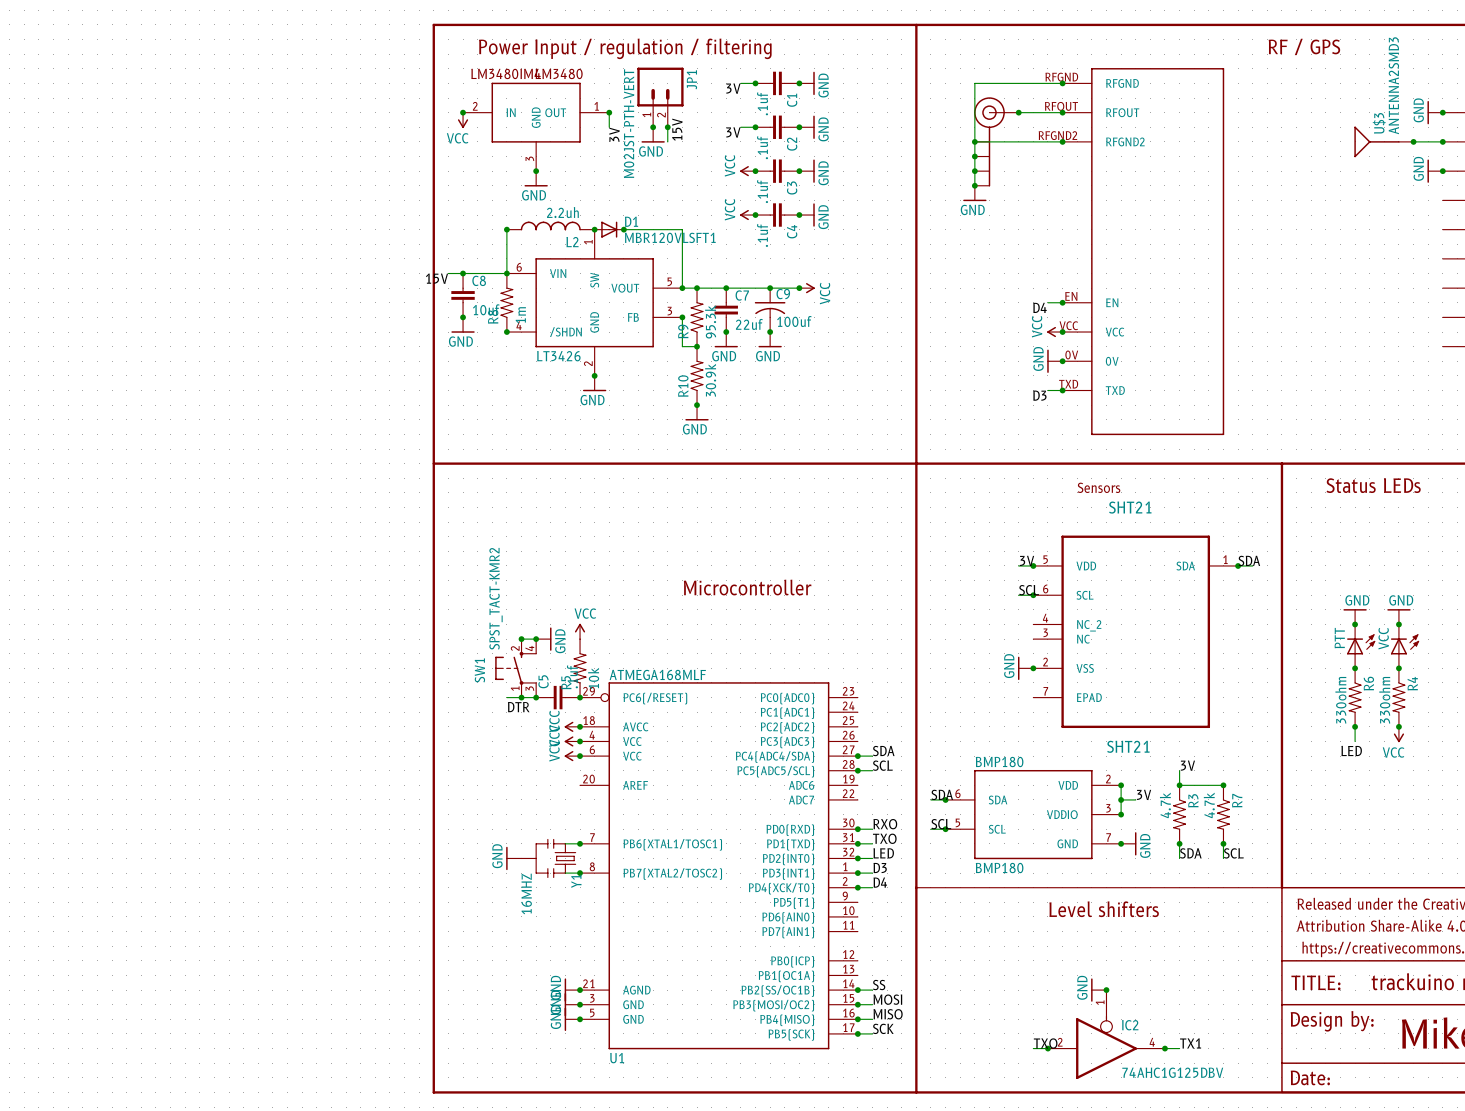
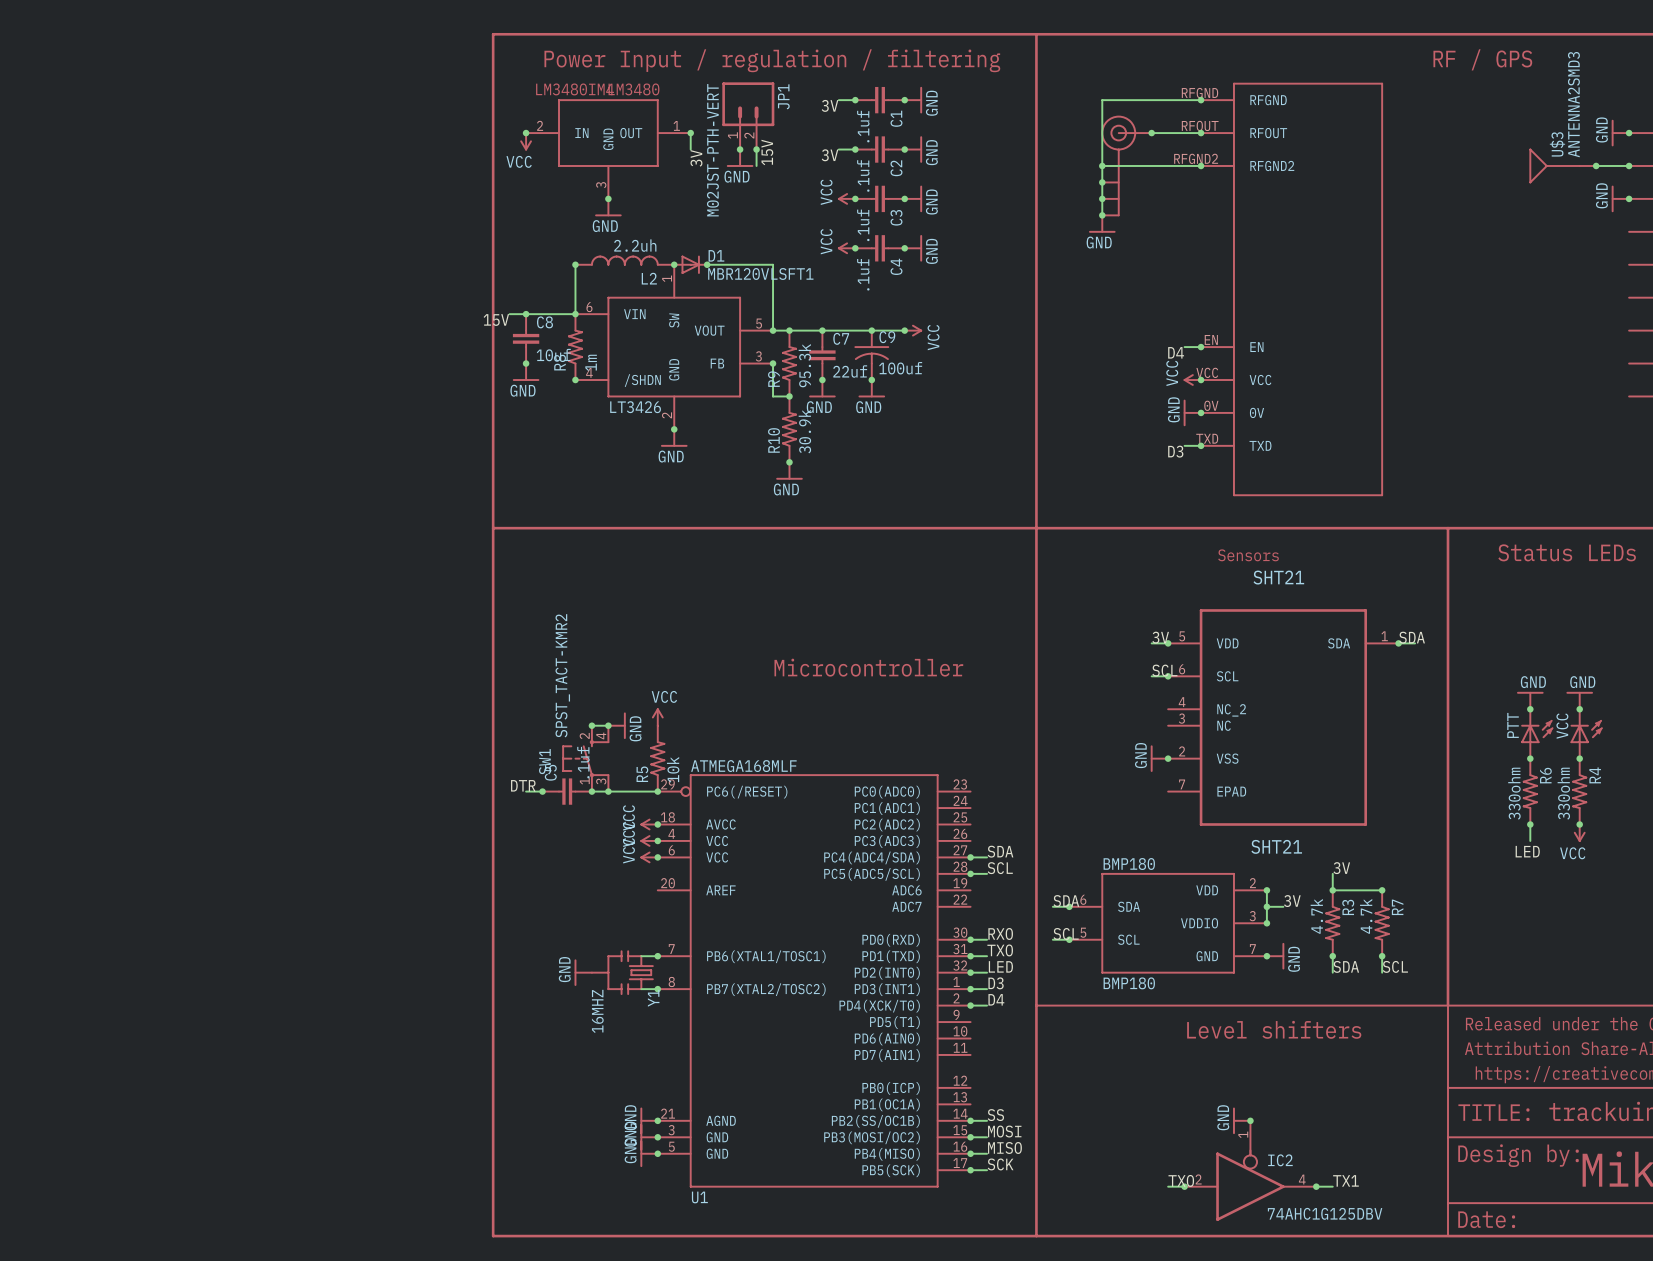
junction: none -> (542, 791)
C5 position: (558, 697) -> (567, 791)
label position: DTR (518, 707) -> DTR (523, 785)

